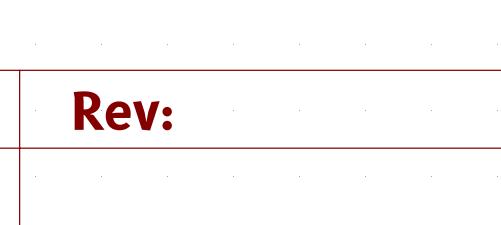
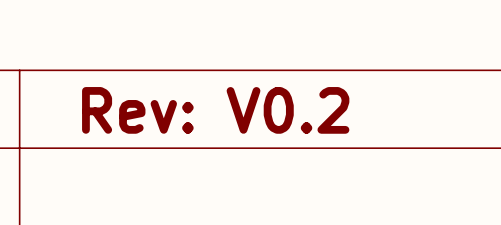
title block: Rev: (122, 110) -> Rev: V0.2 (215, 110)

